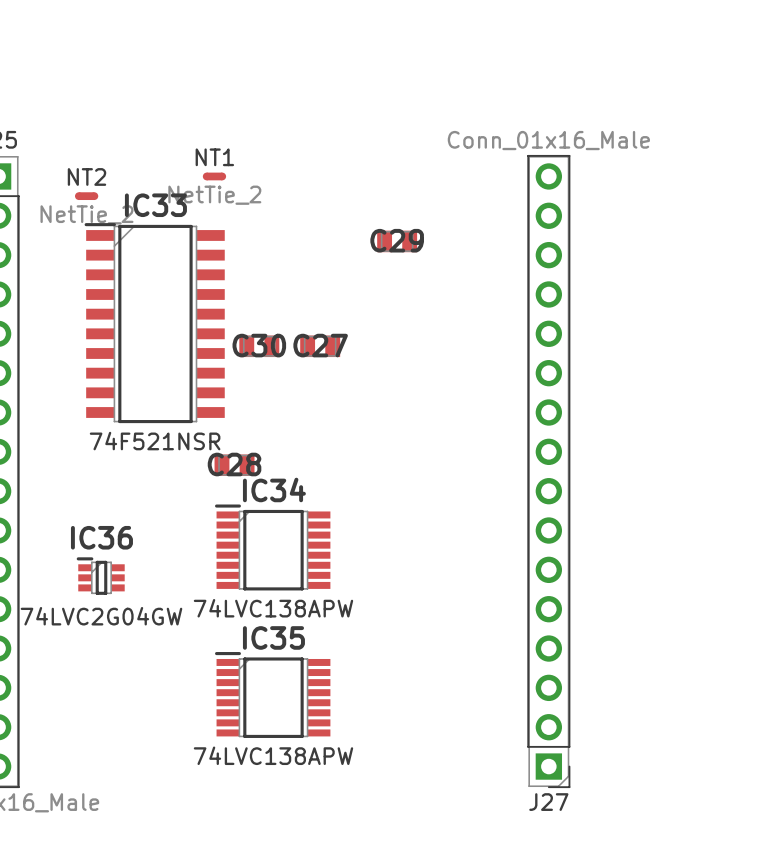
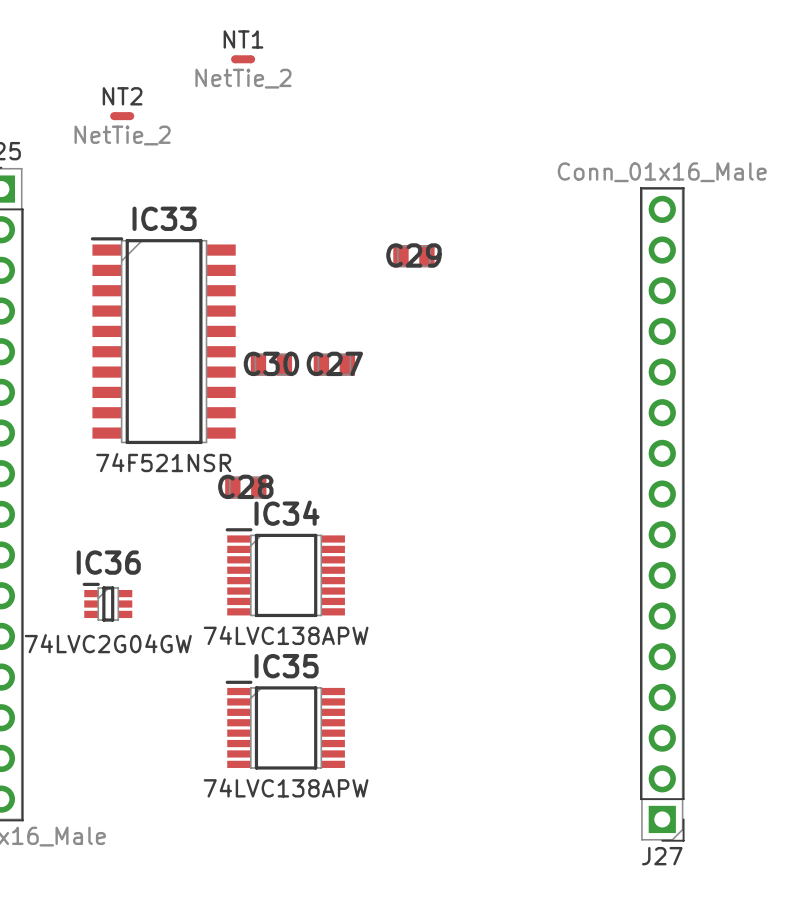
NT1 position: (214, 176) -> (243, 59)
NT2 position: (86, 196) -> (122, 116)
J27 position: (548, 471) -> (662, 514)

